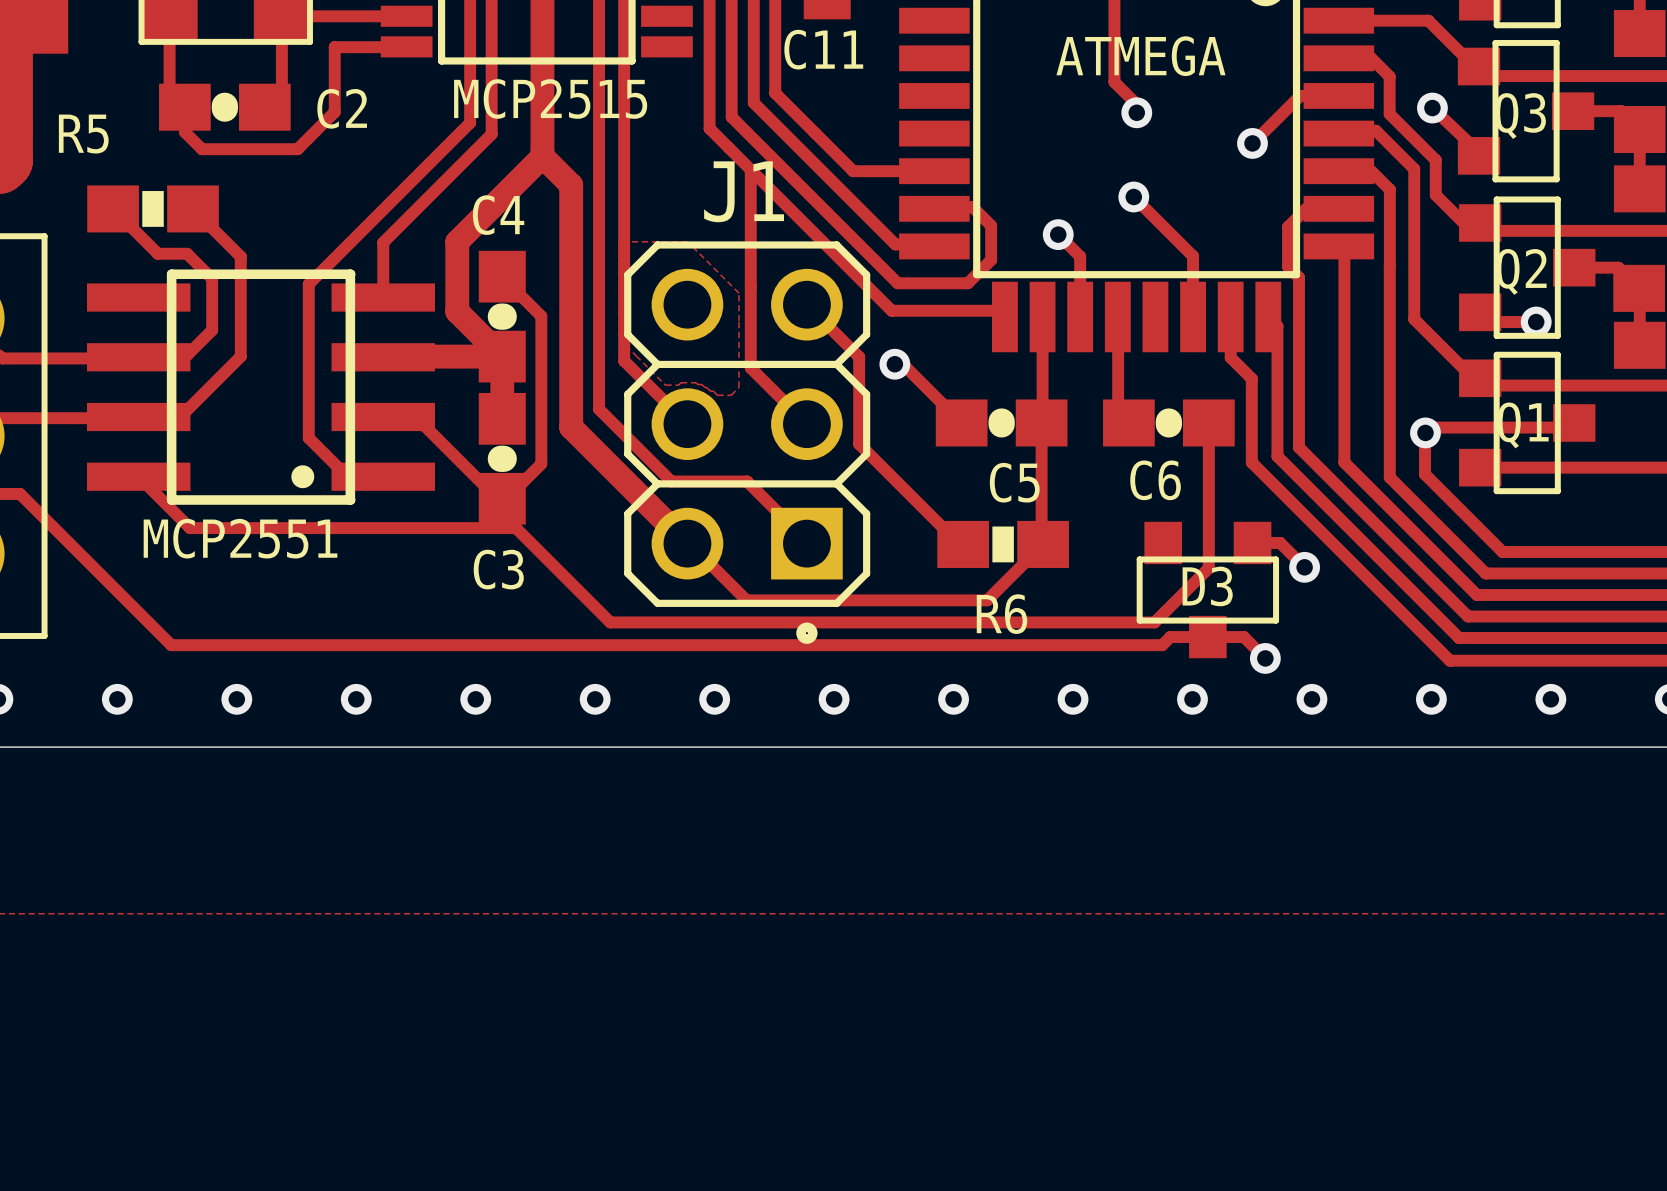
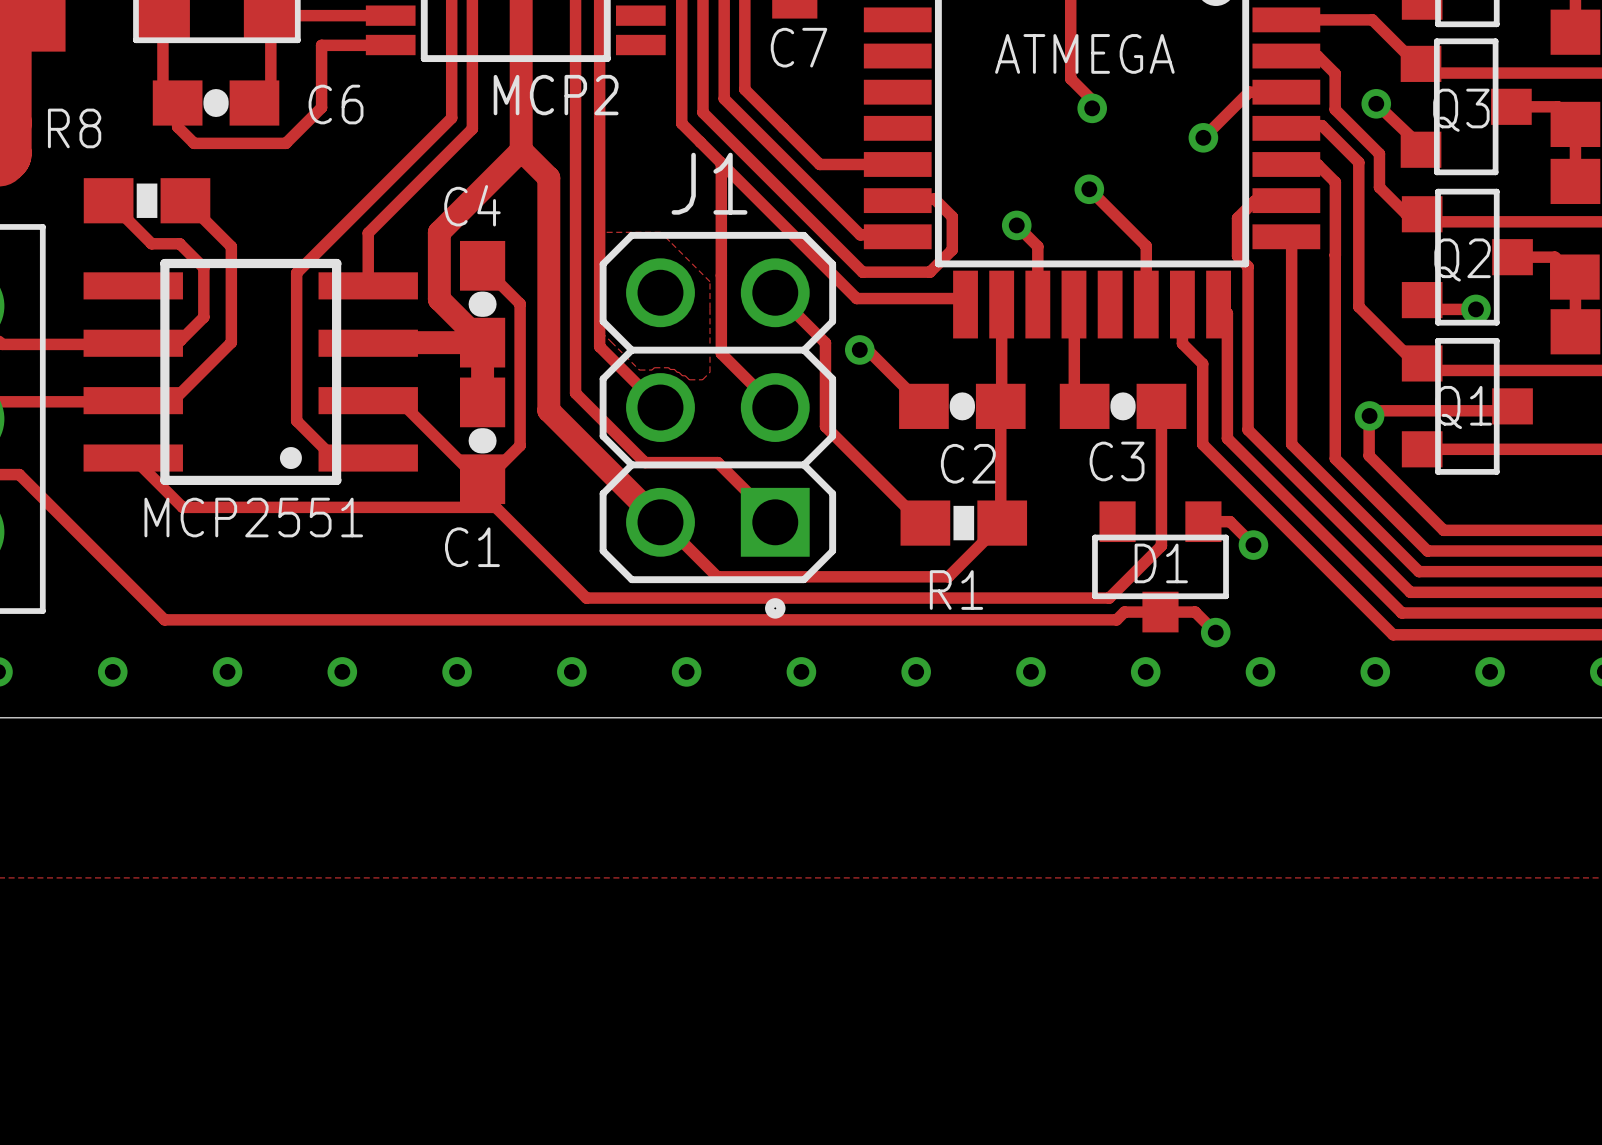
C11 name: C11 (823, 49) -> C7 (799, 47)
MCP2515 name: MCP2515 (550, 98) -> MCP2 (556, 95)
C2 name: C2 (342, 108) -> C6 (336, 104)
R5 name: R5 (83, 134) -> R8 (74, 128)
C6 name: C6 (1155, 480) -> C3 (1117, 461)
C5 name: C5 (1014, 482) -> C2 (968, 463)
C3 name: C3 (498, 569) -> C1 (472, 547)
D3 name: D3 (1207, 586) -> D1 (1161, 563)
R6 name: R6 (1002, 614) -> R1 (956, 590)

